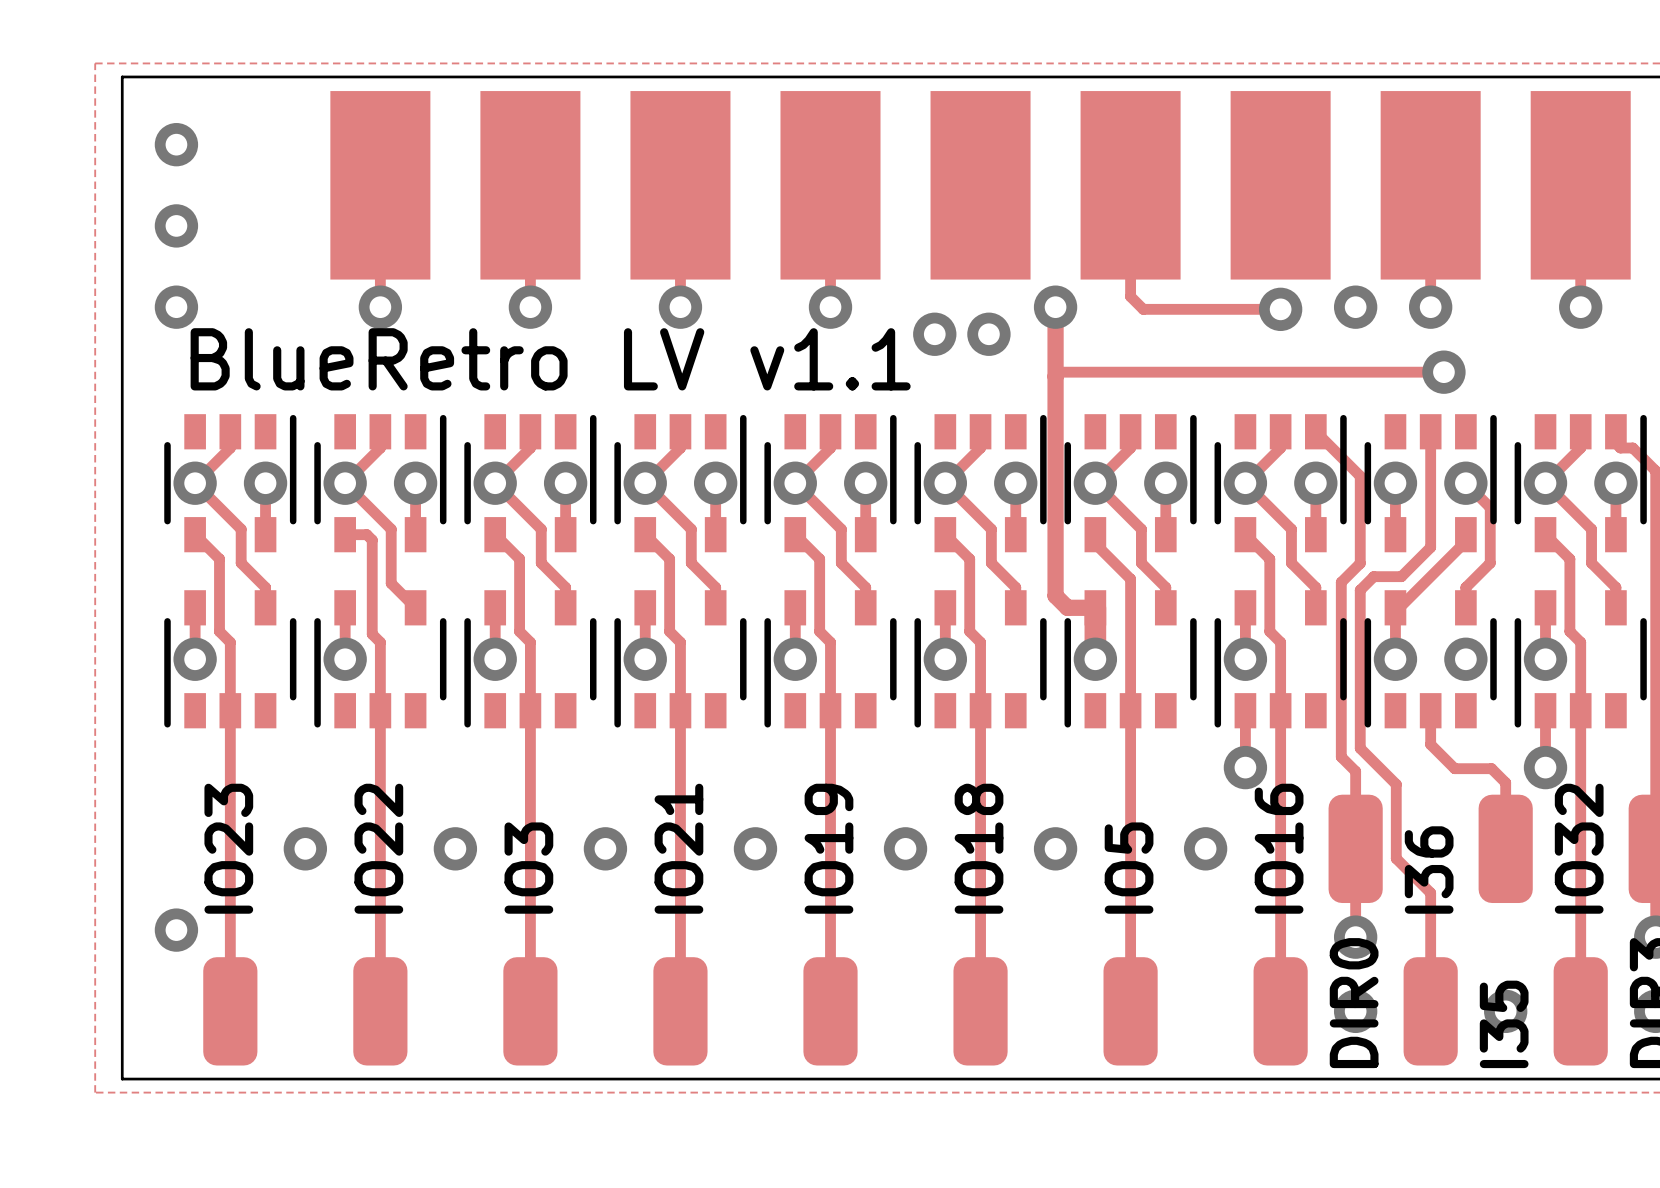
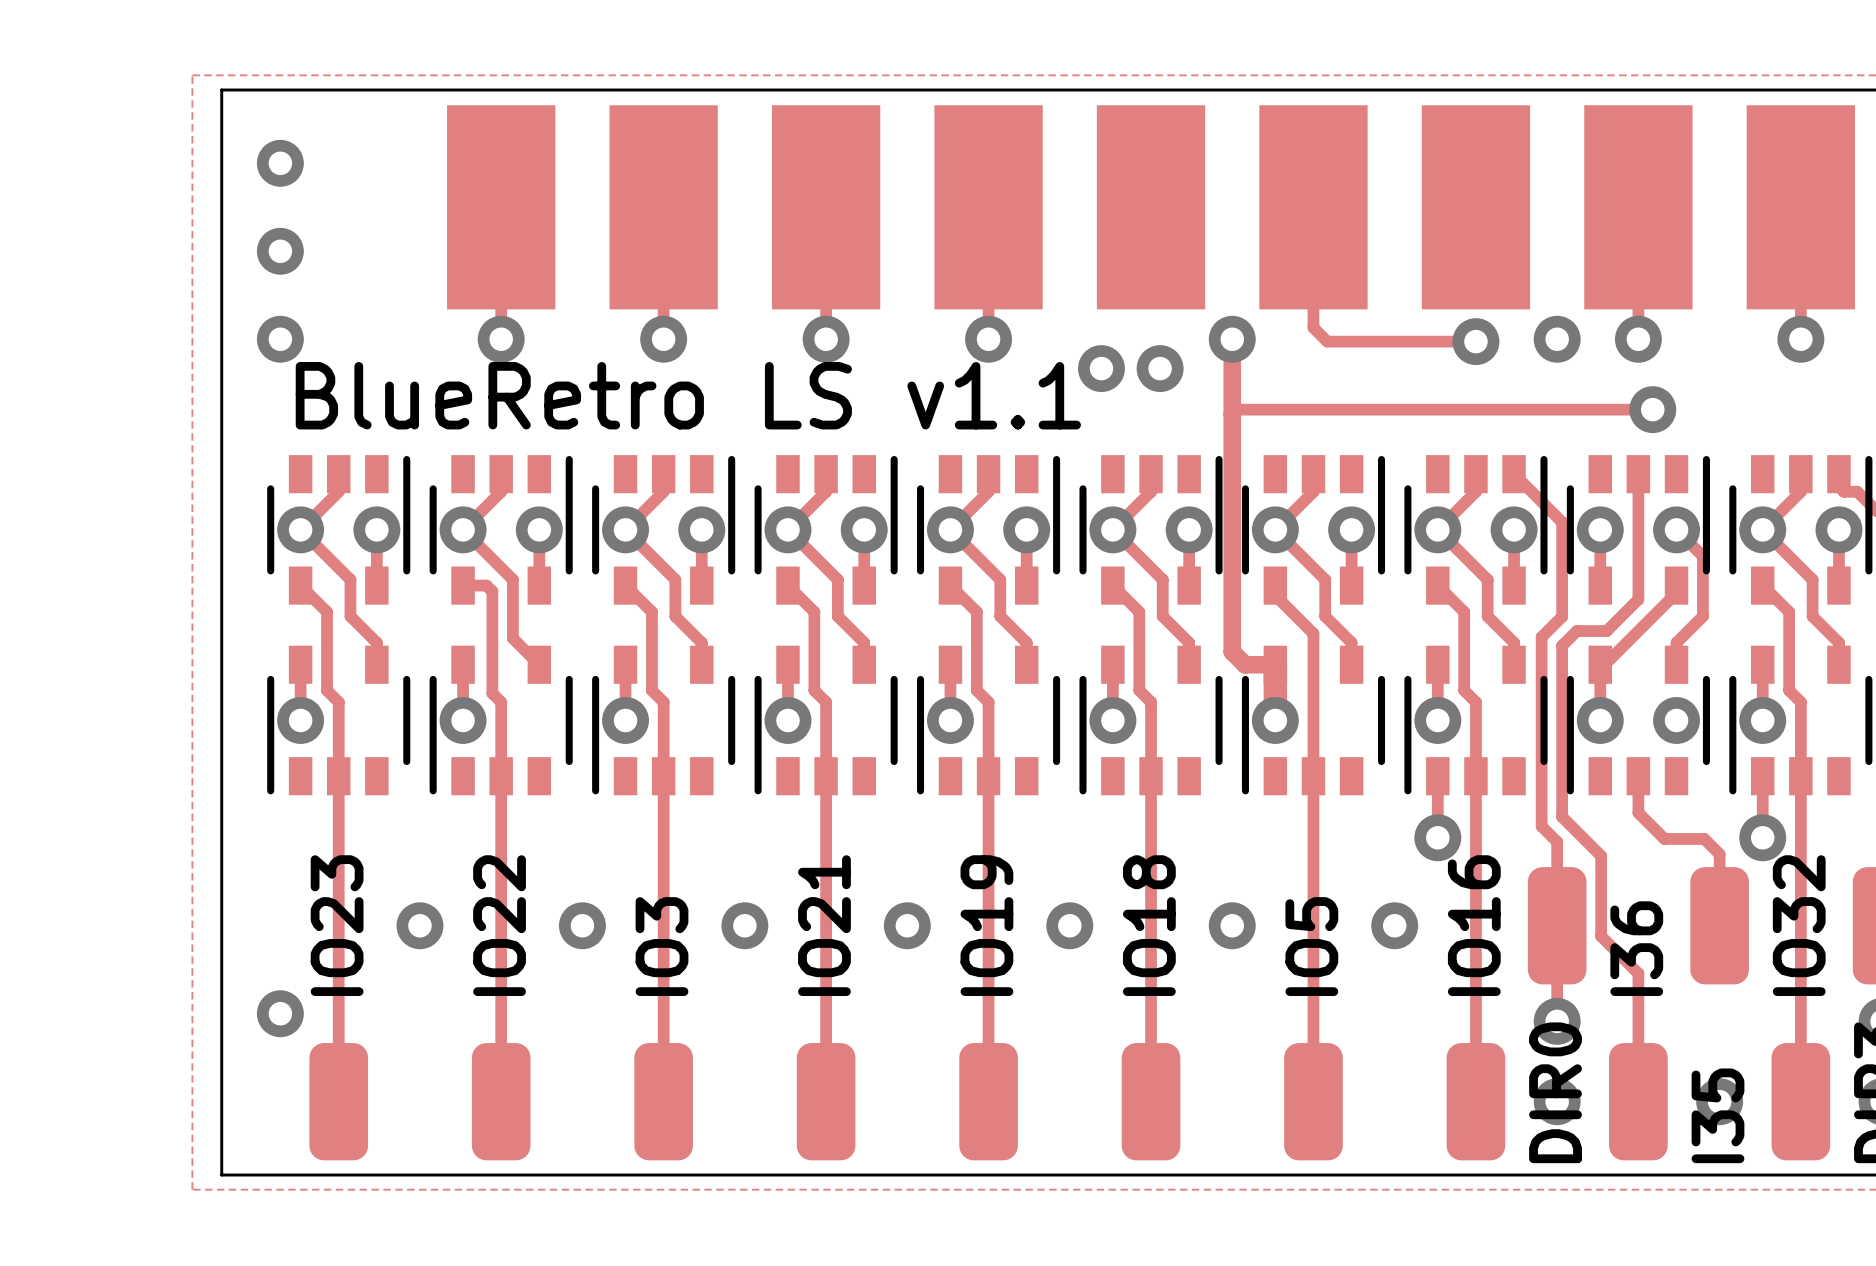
text: BlueRetro LV v1.1 (550, 359) -> BlueRetro LS v1.1 (688, 395)

